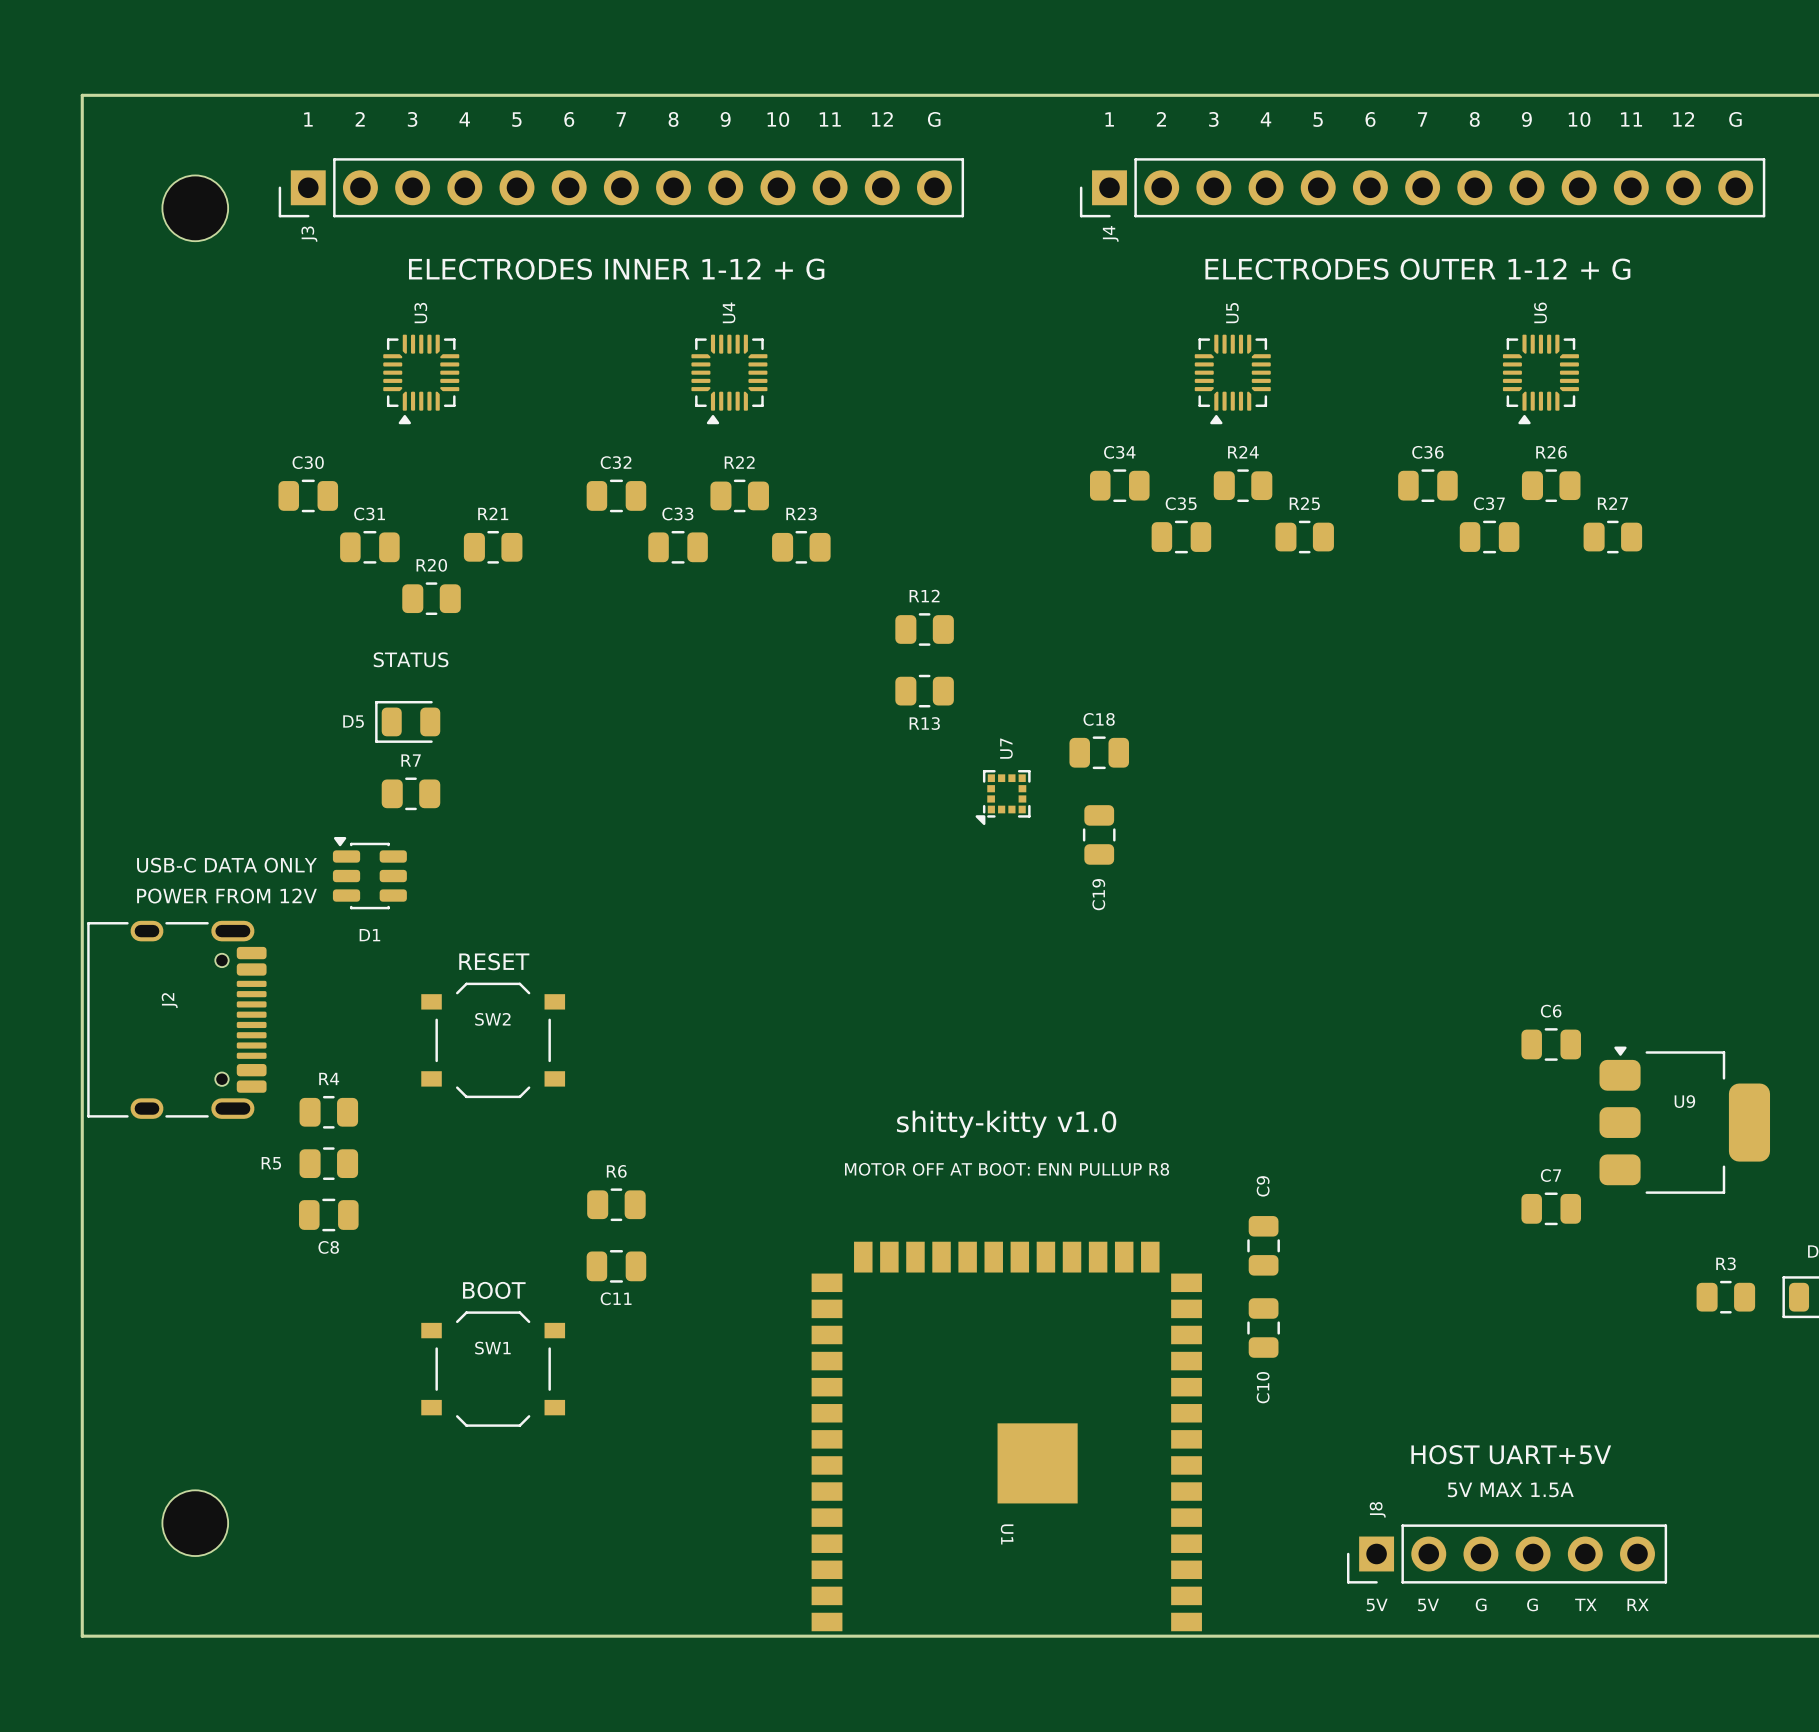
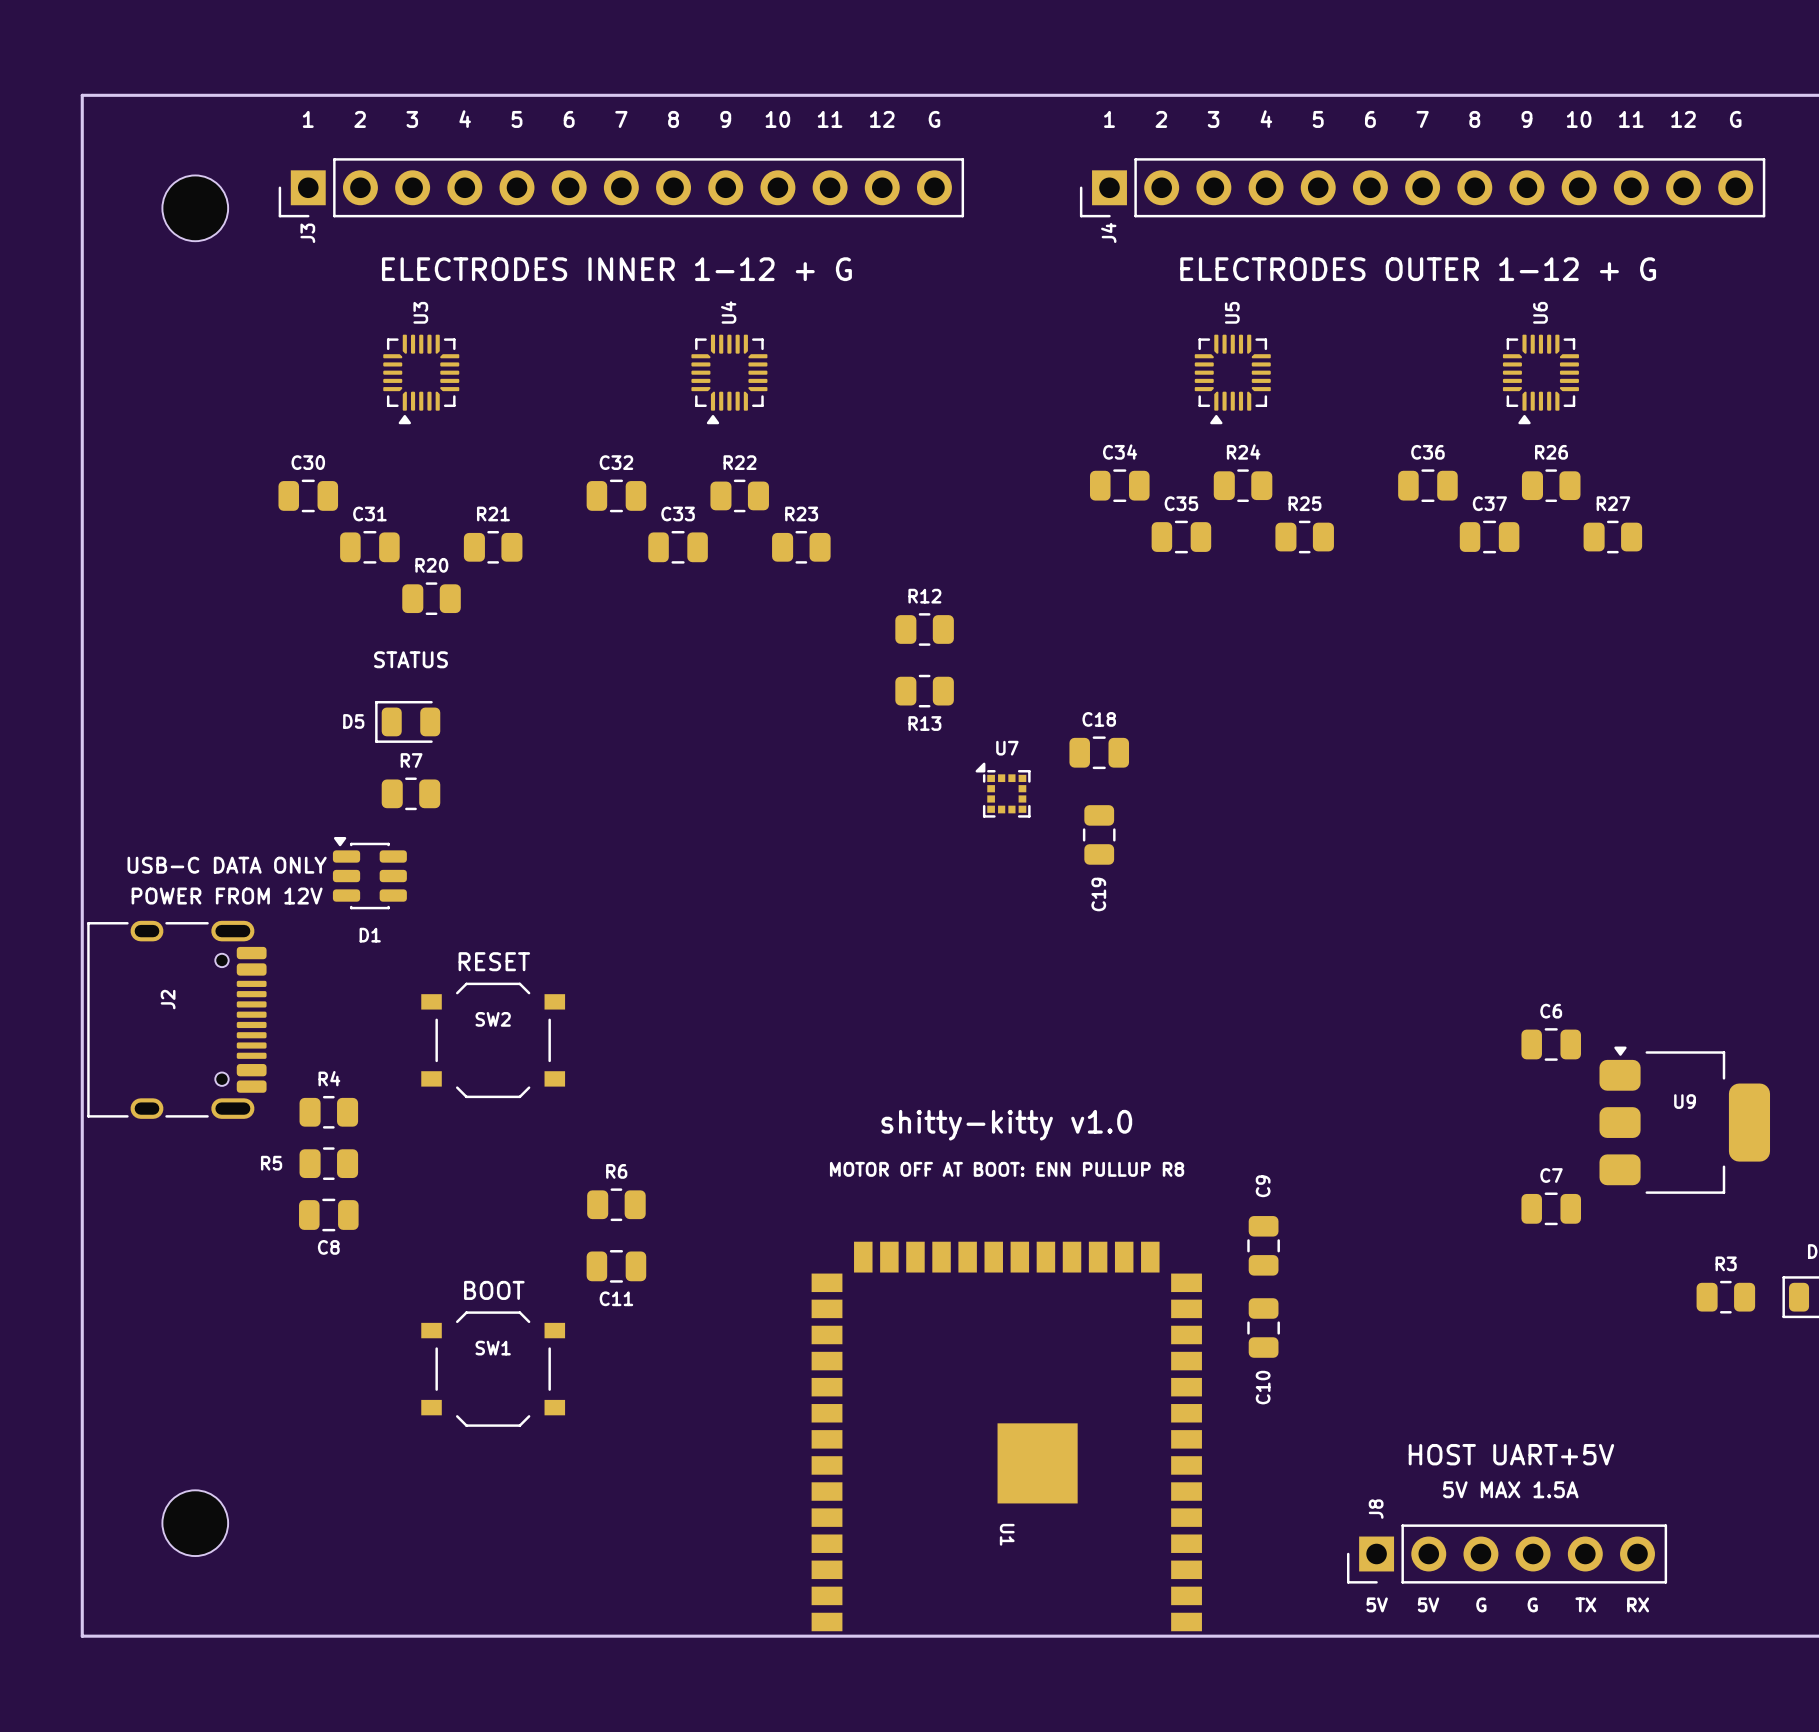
U7 rotation: 0° (1003, 797) -> 90° clockwise (1003, 790)

